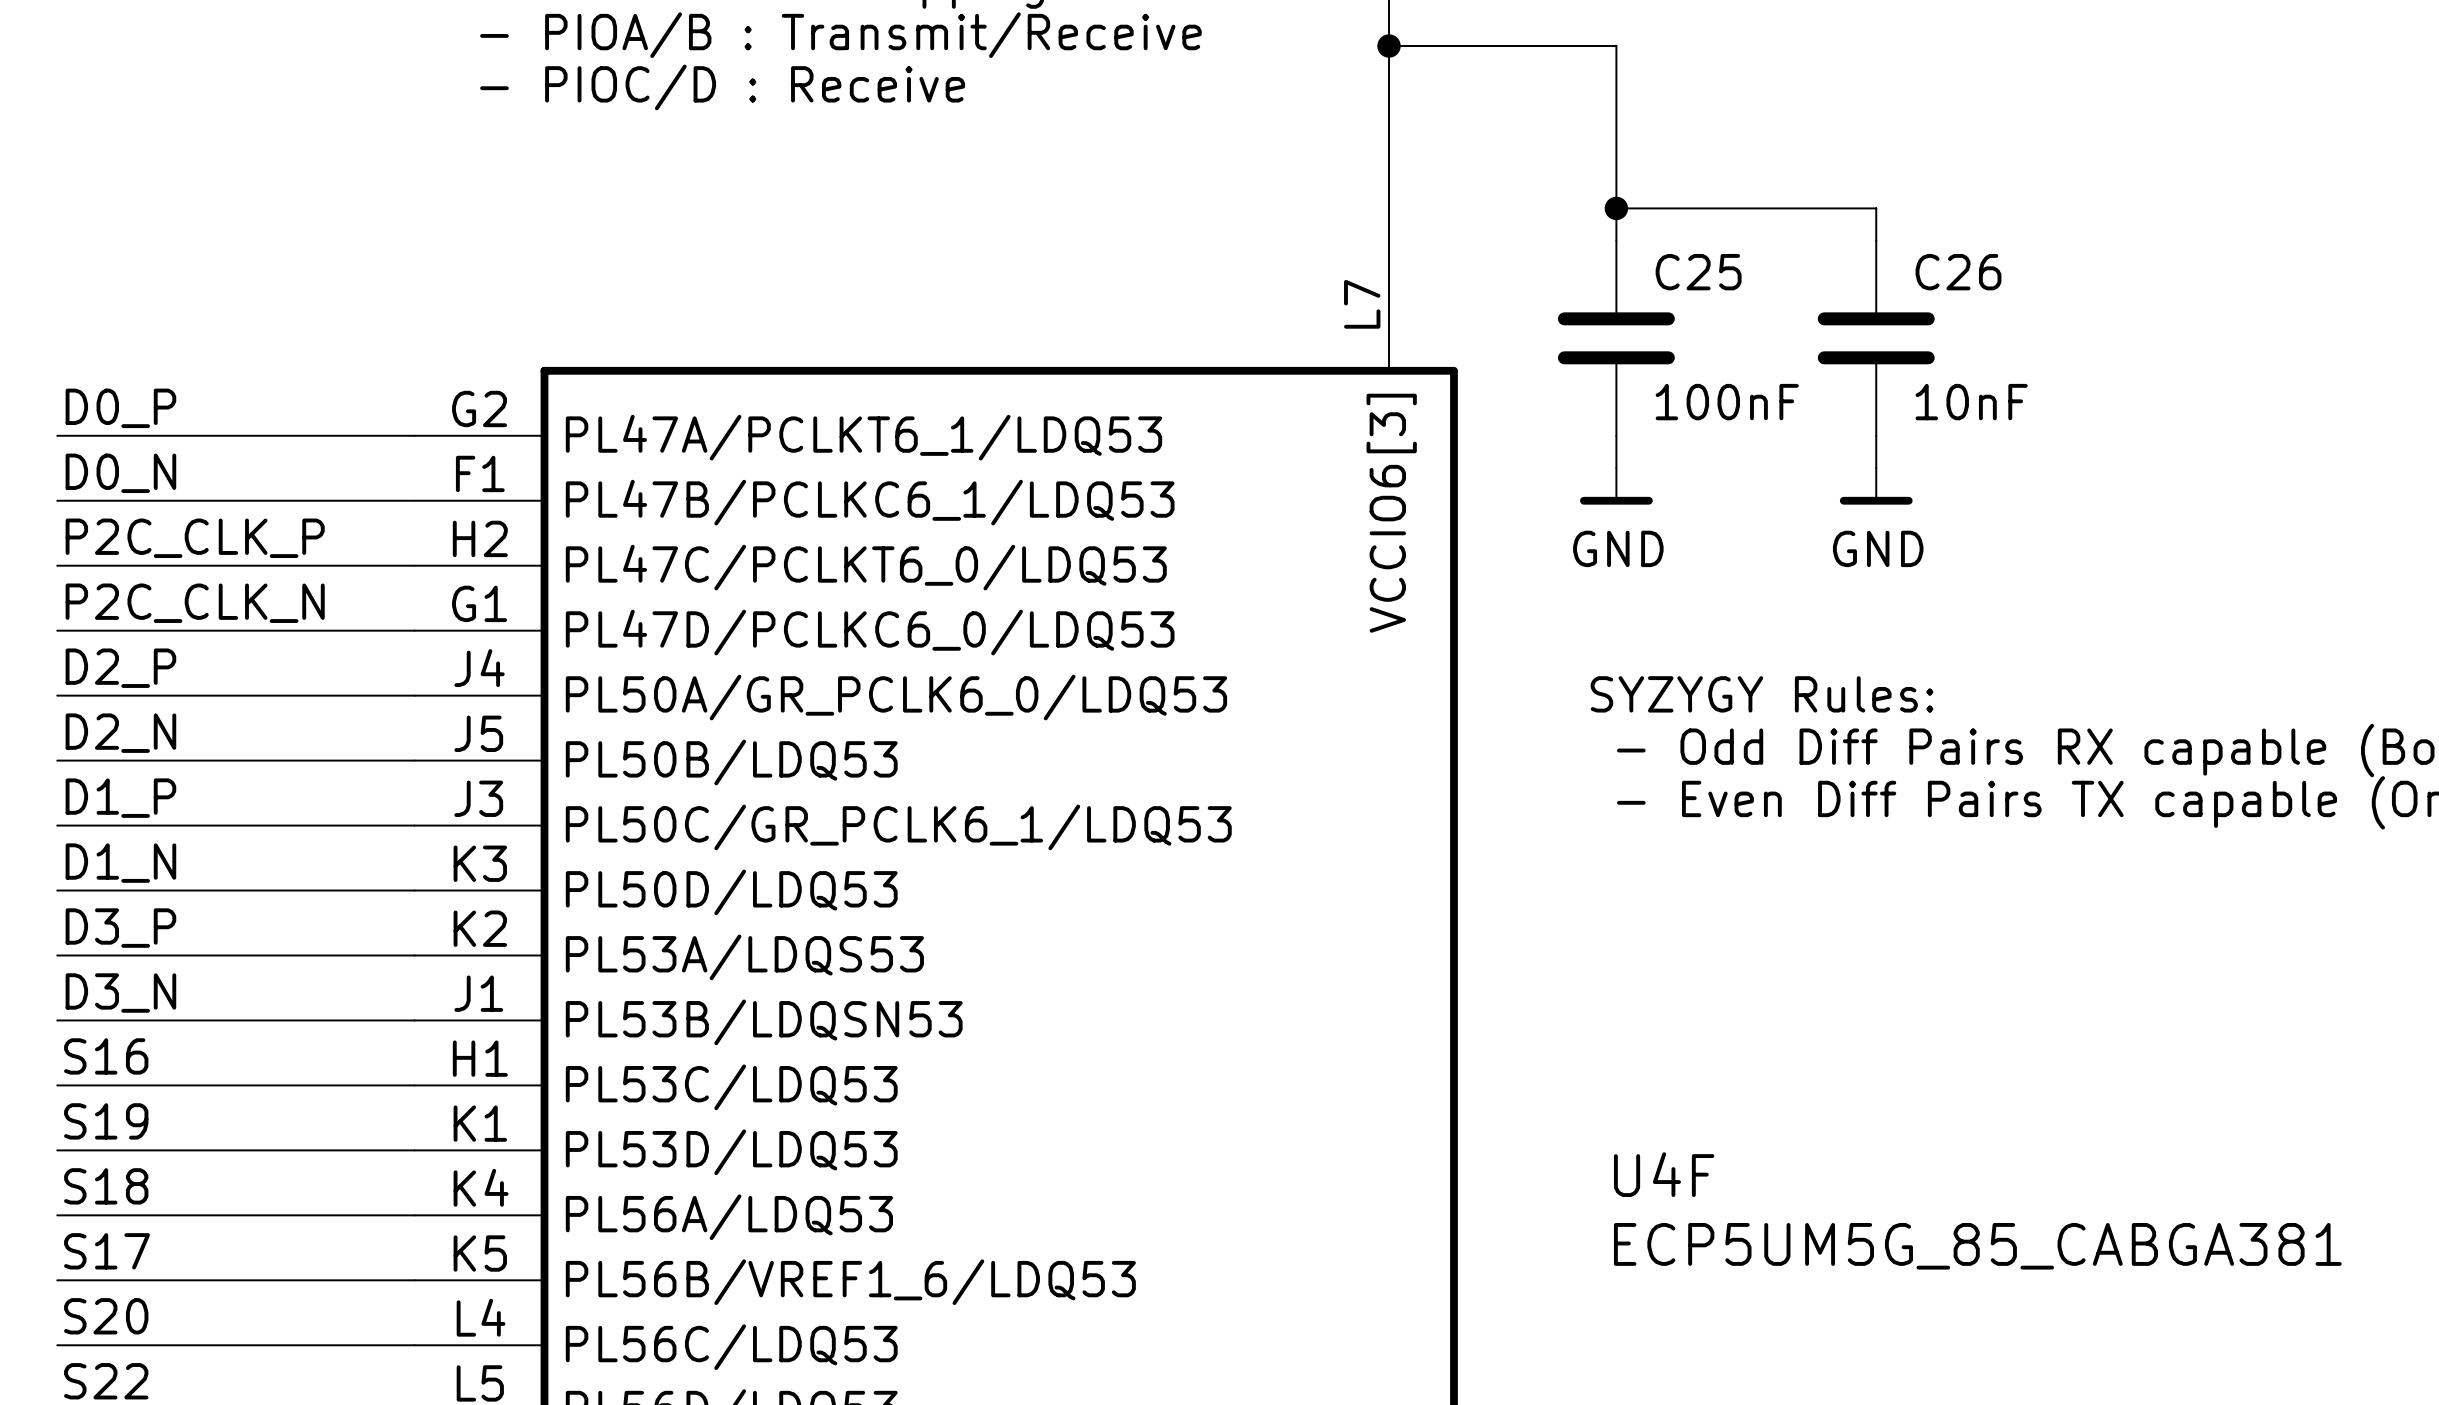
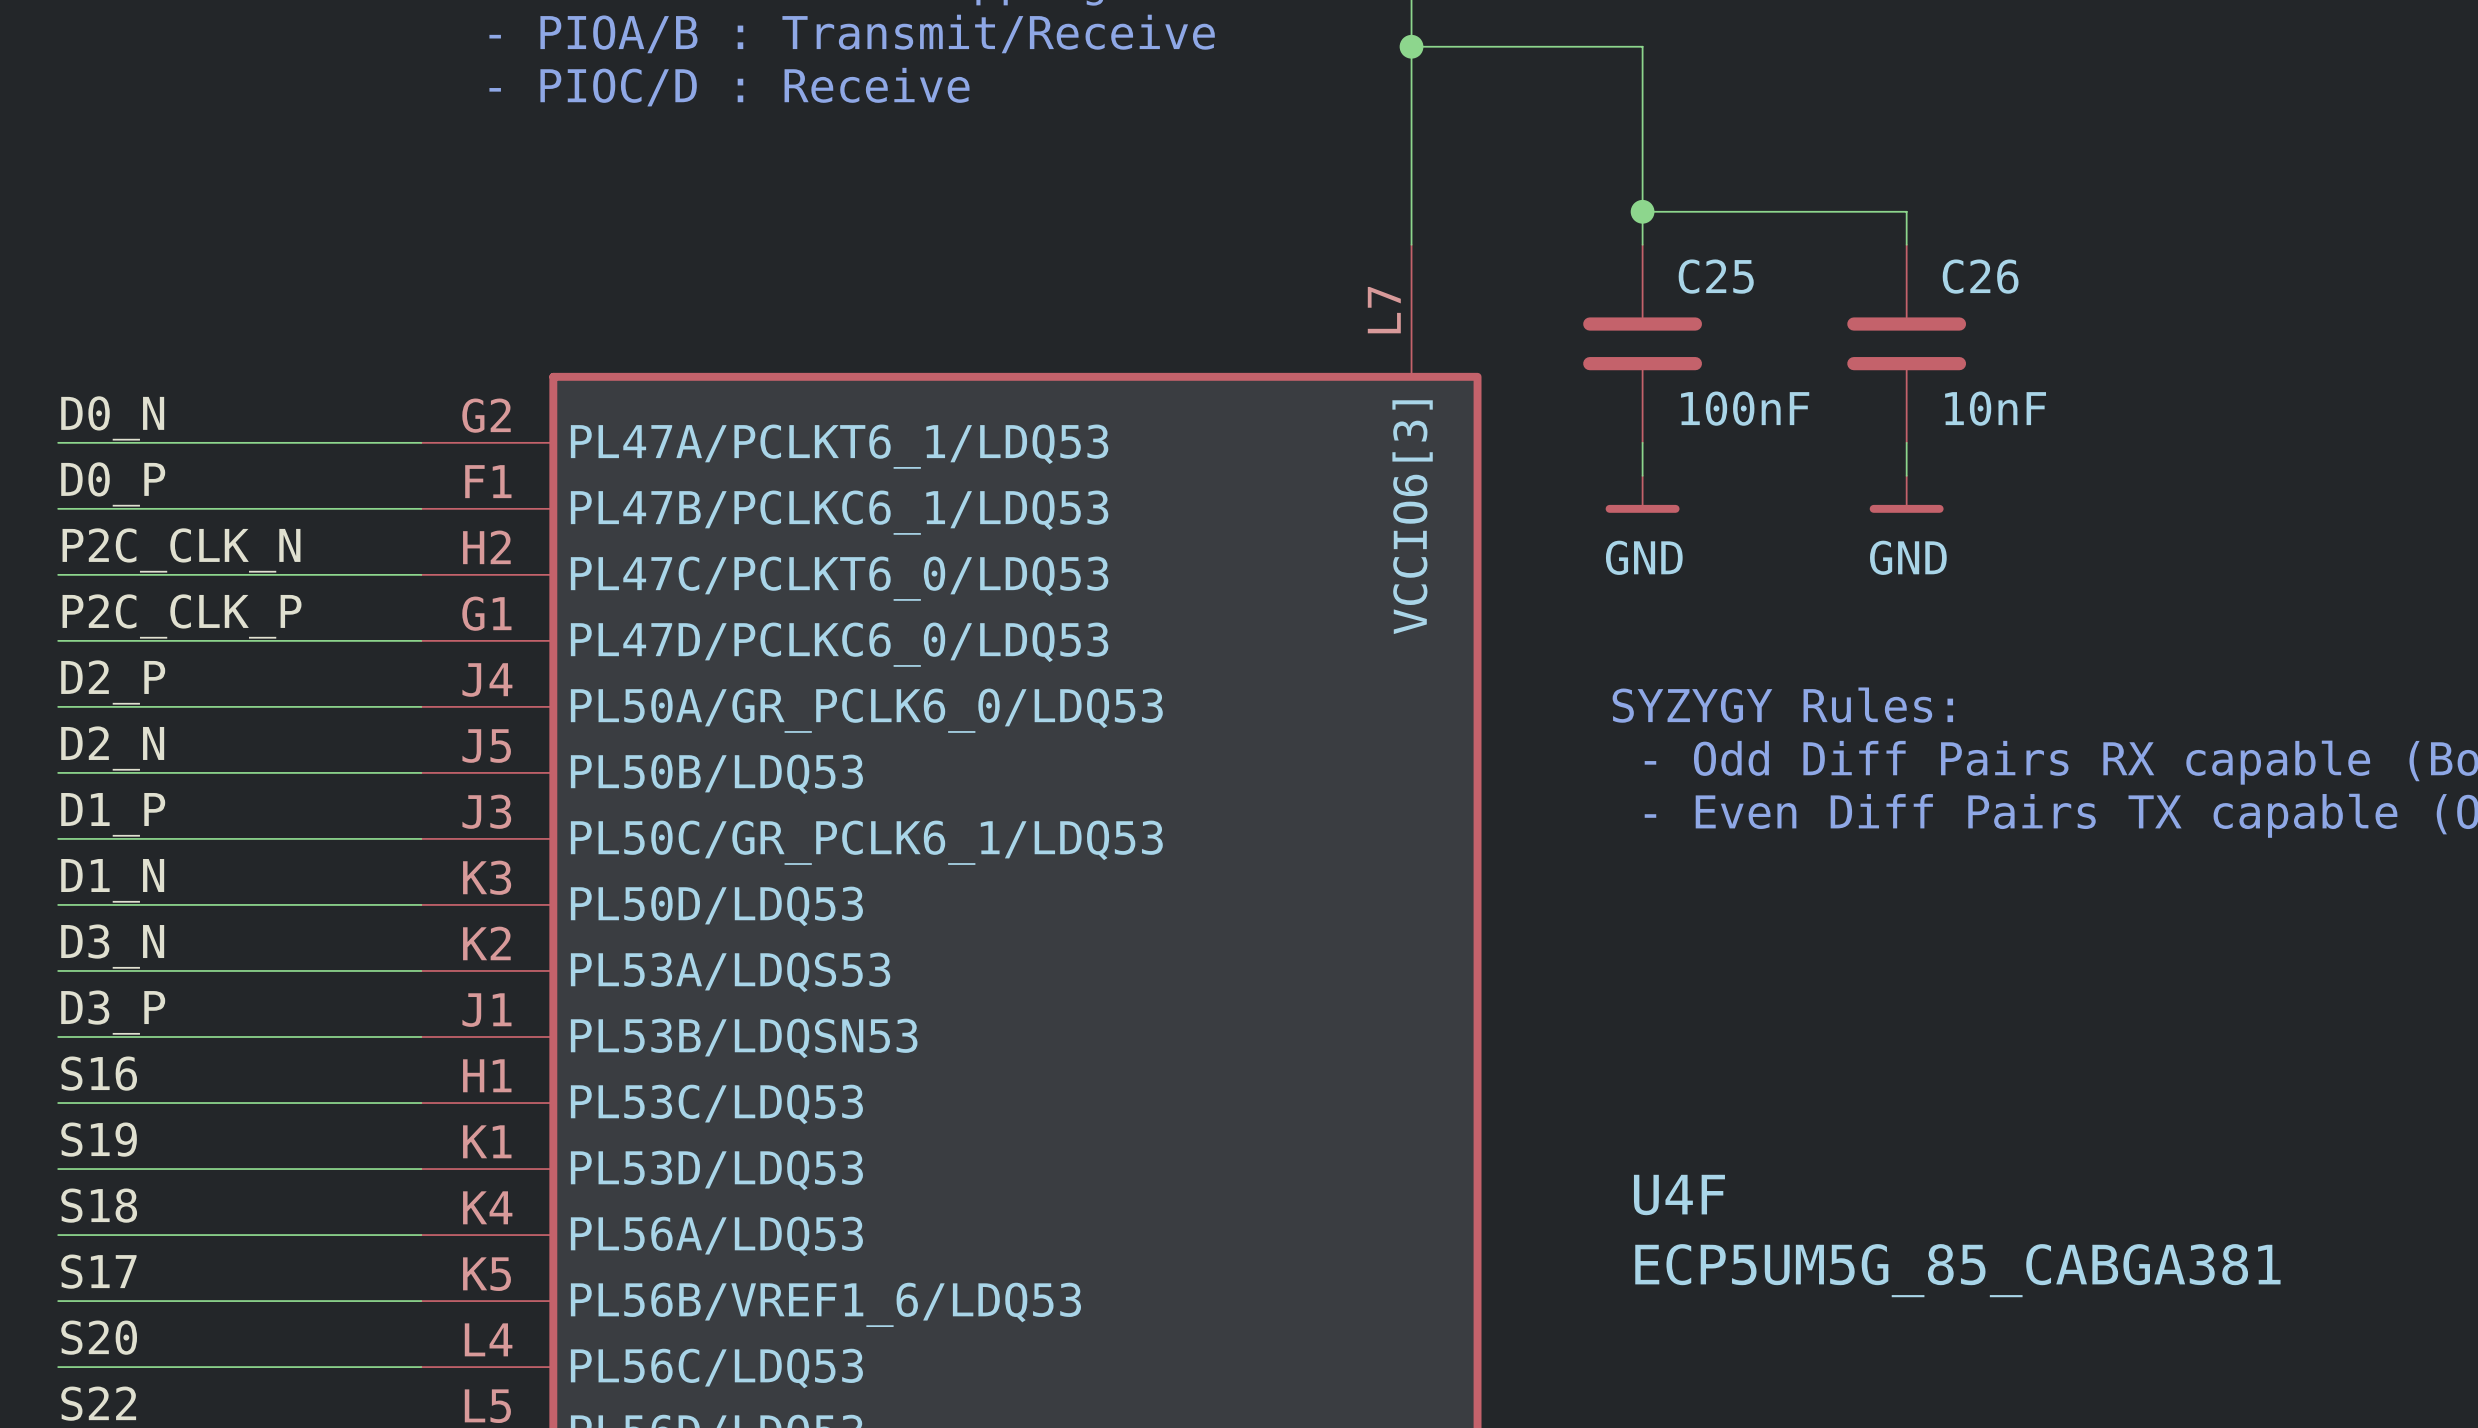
label: D0_P (120, 408) -> D0_N (112, 418)
label: D0_N (120, 473) -> D0_P (113, 484)
label: P2C_CLK_P (195, 538) -> P2C_CLK_N (181, 550)
label: P2C_CLK_N (195, 603) -> P2C_CLK_P (182, 616)
label: D3_P (120, 928) -> D3_N (112, 946)
label: D3_N (120, 993) -> D3_P (113, 1012)

